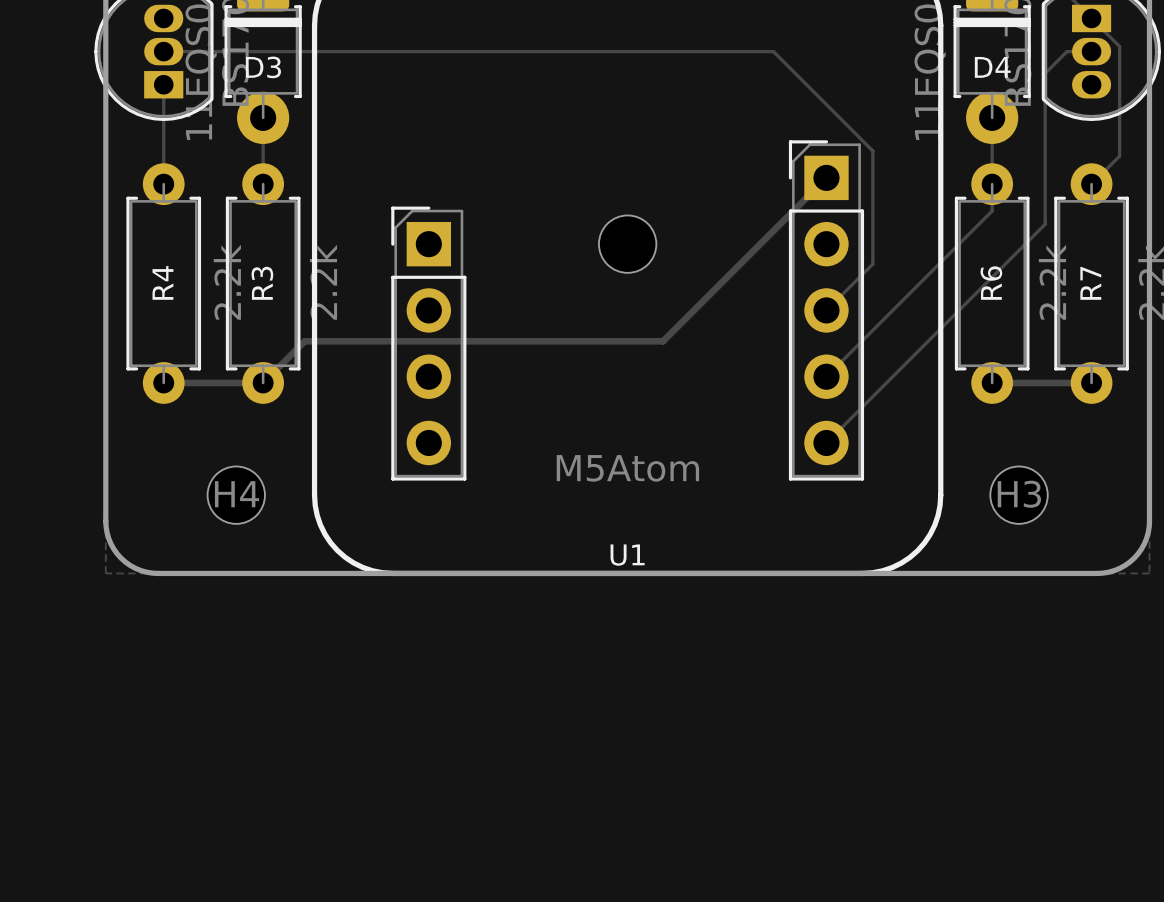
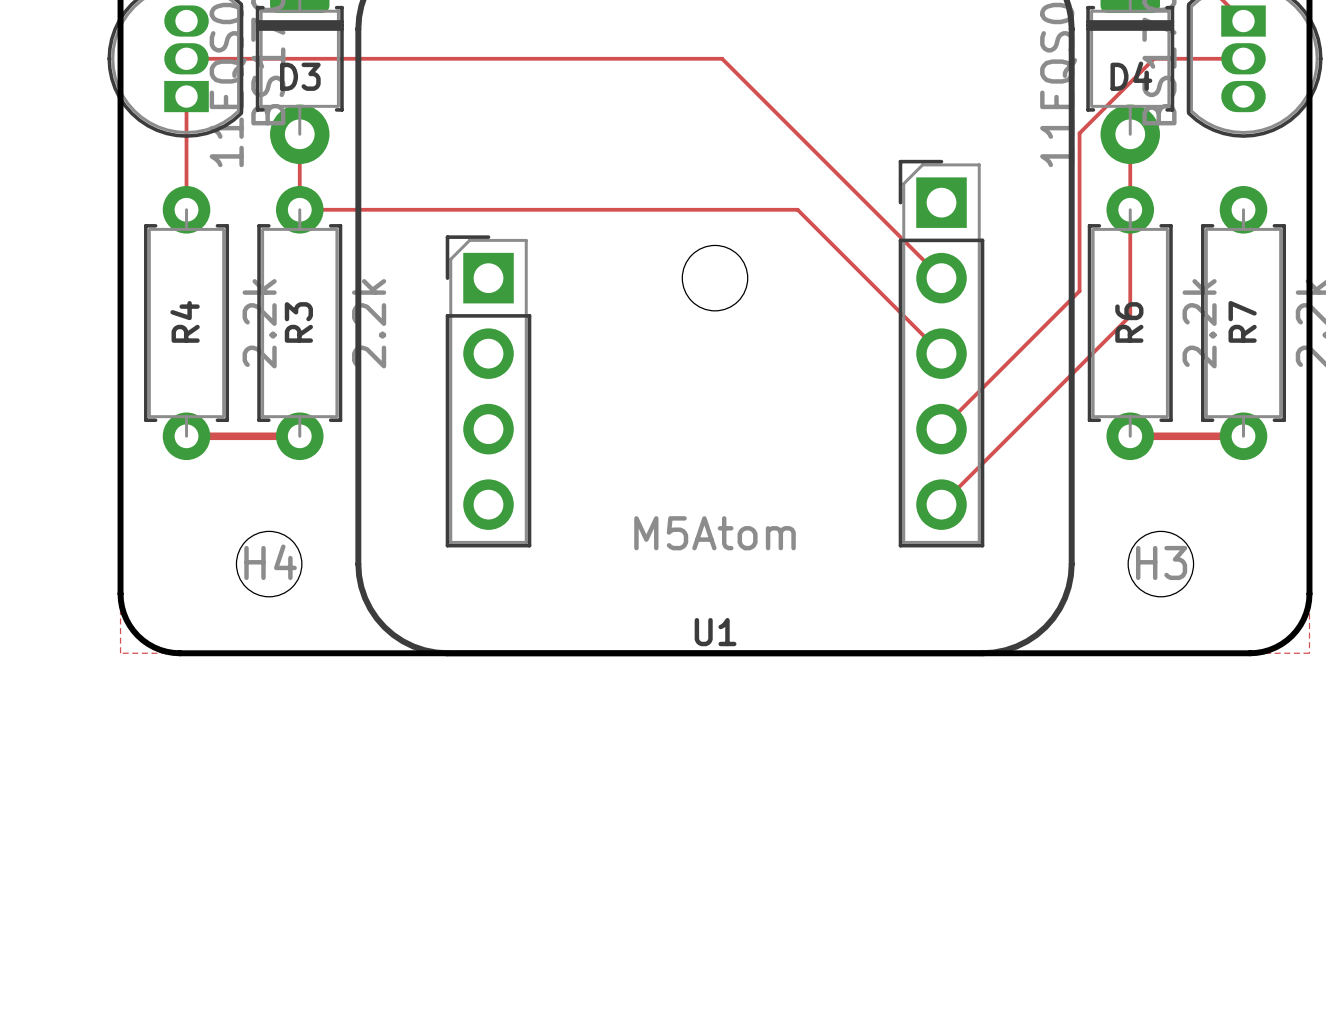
track: (1091, 18) (1119, 46) (1119, 156) (1091, 184) -> none
track: (633, 51) (773, 51) (872, 151) (872, 264) (826, 310) -> (722, 58) (941, 278)
track: (1066, 51) (1045, 73) (1045, 224) (992, 277) -> (1215, 58) (1154, 58) (1079, 133) (1079, 291)
track: (826, 177) (663, 341) (304, 341) (263, 382) -> none
track: none -> (299, 209) (797, 209) (941, 353)
track: (992, 211) (947, 255) -> (1130, 240) (1130, 315)

